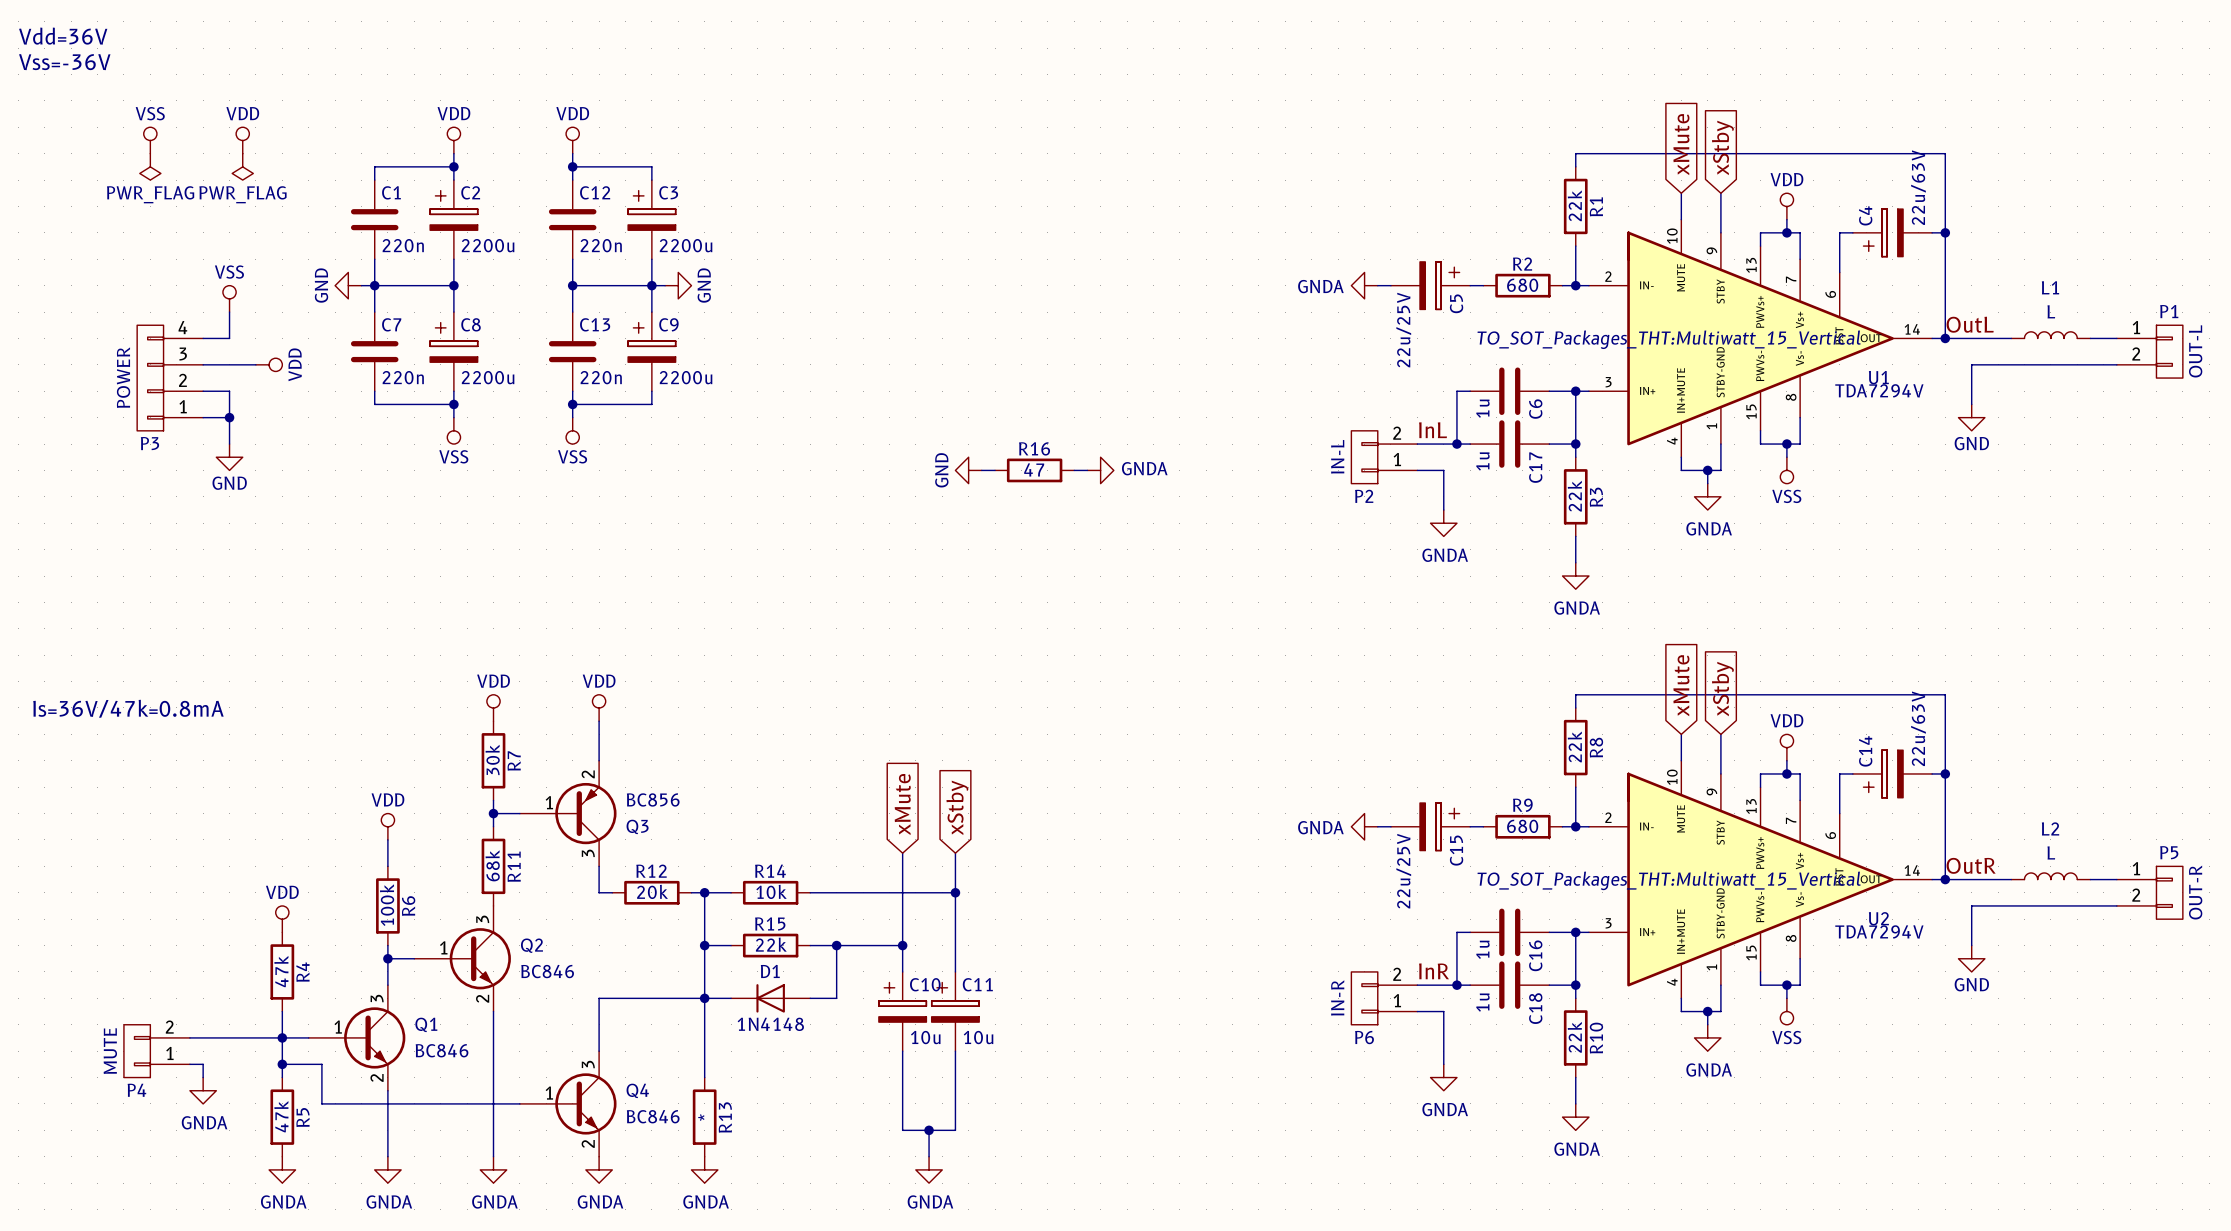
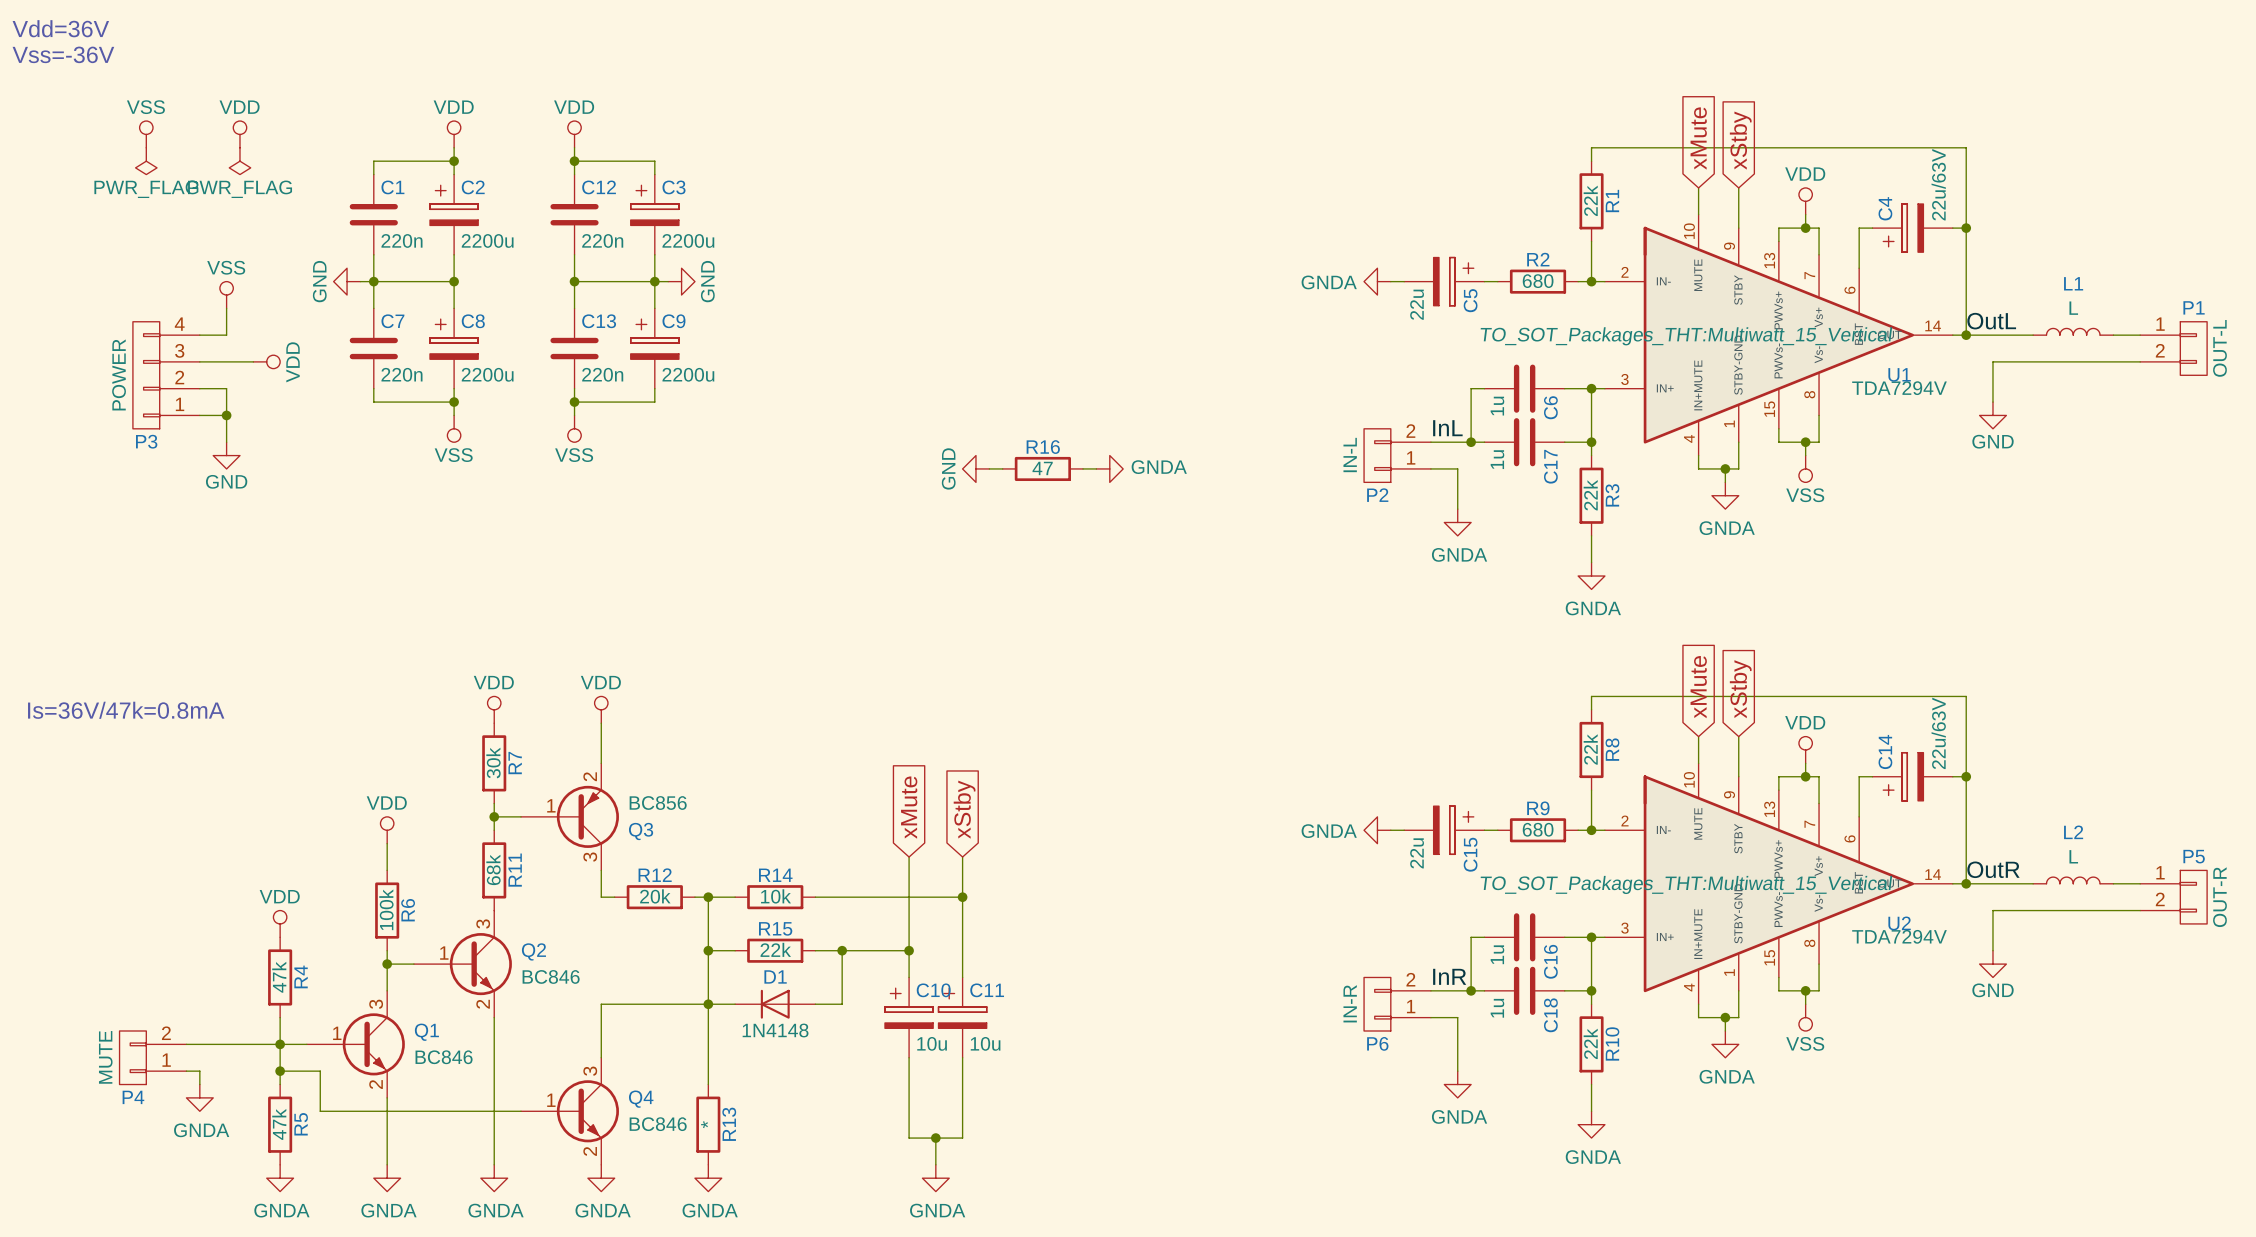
C5 value: 22u/25V (1403, 330) -> 22u (1417, 304)
C15 value: 22u/25V (1403, 871) -> 22u (1417, 853)

